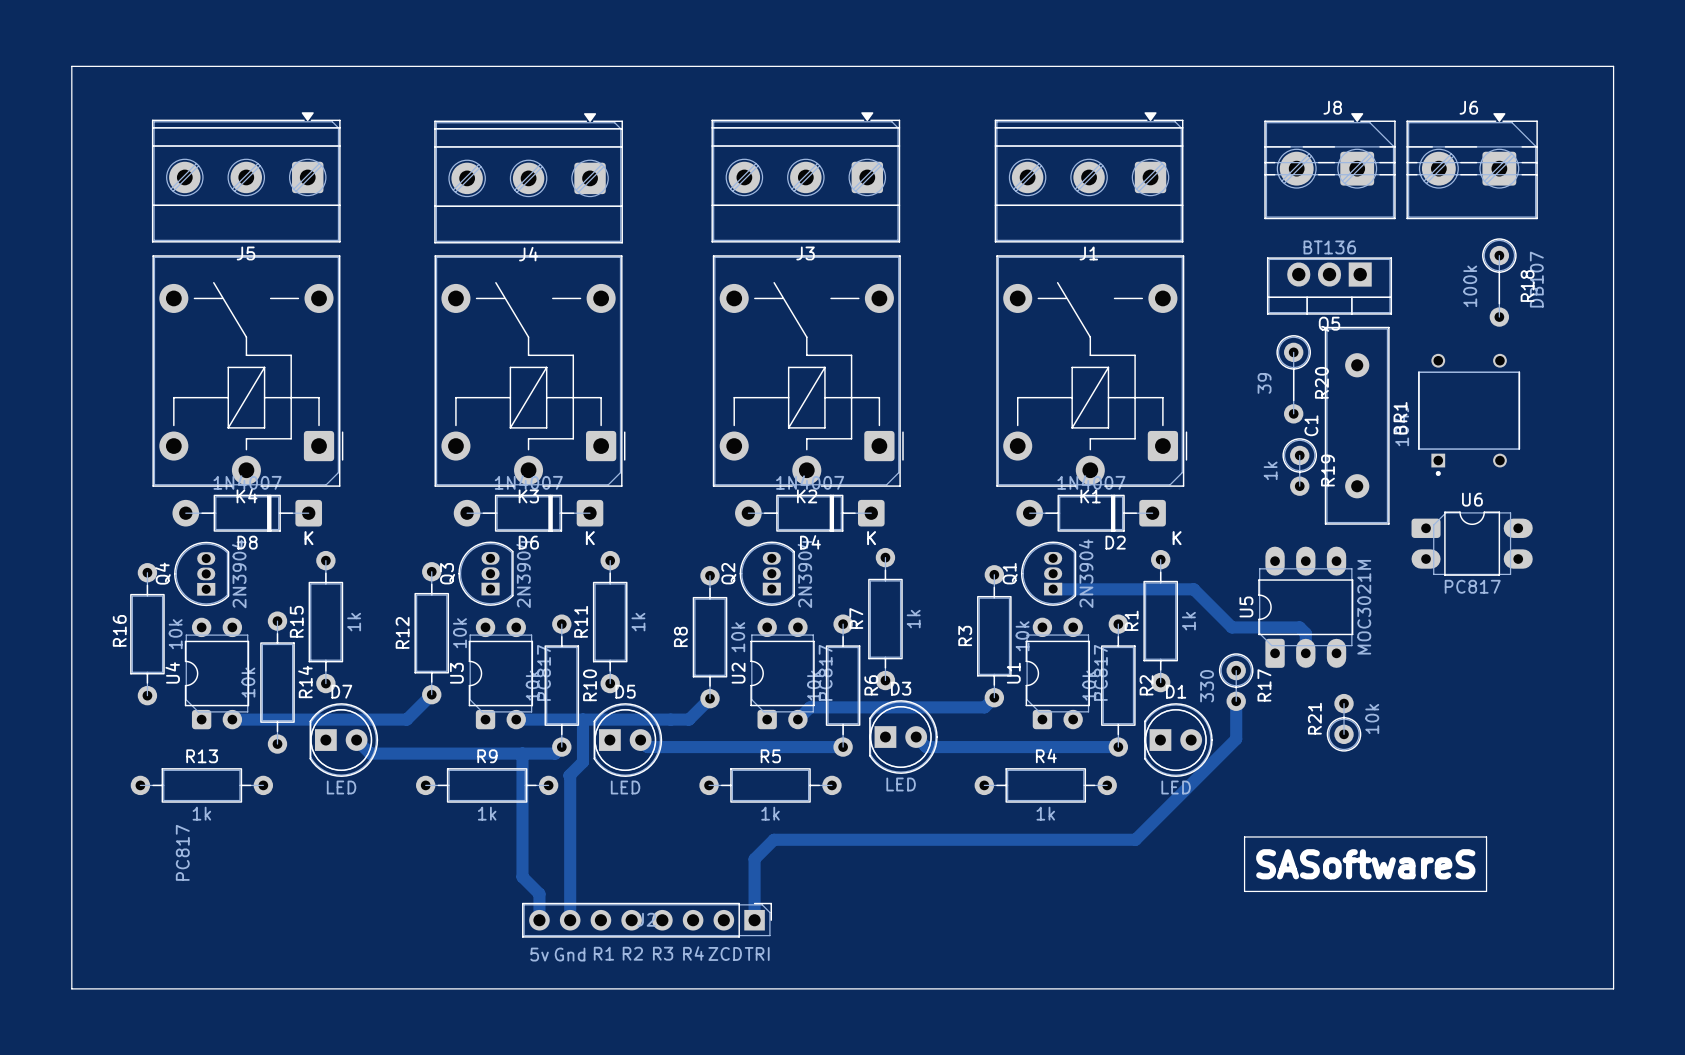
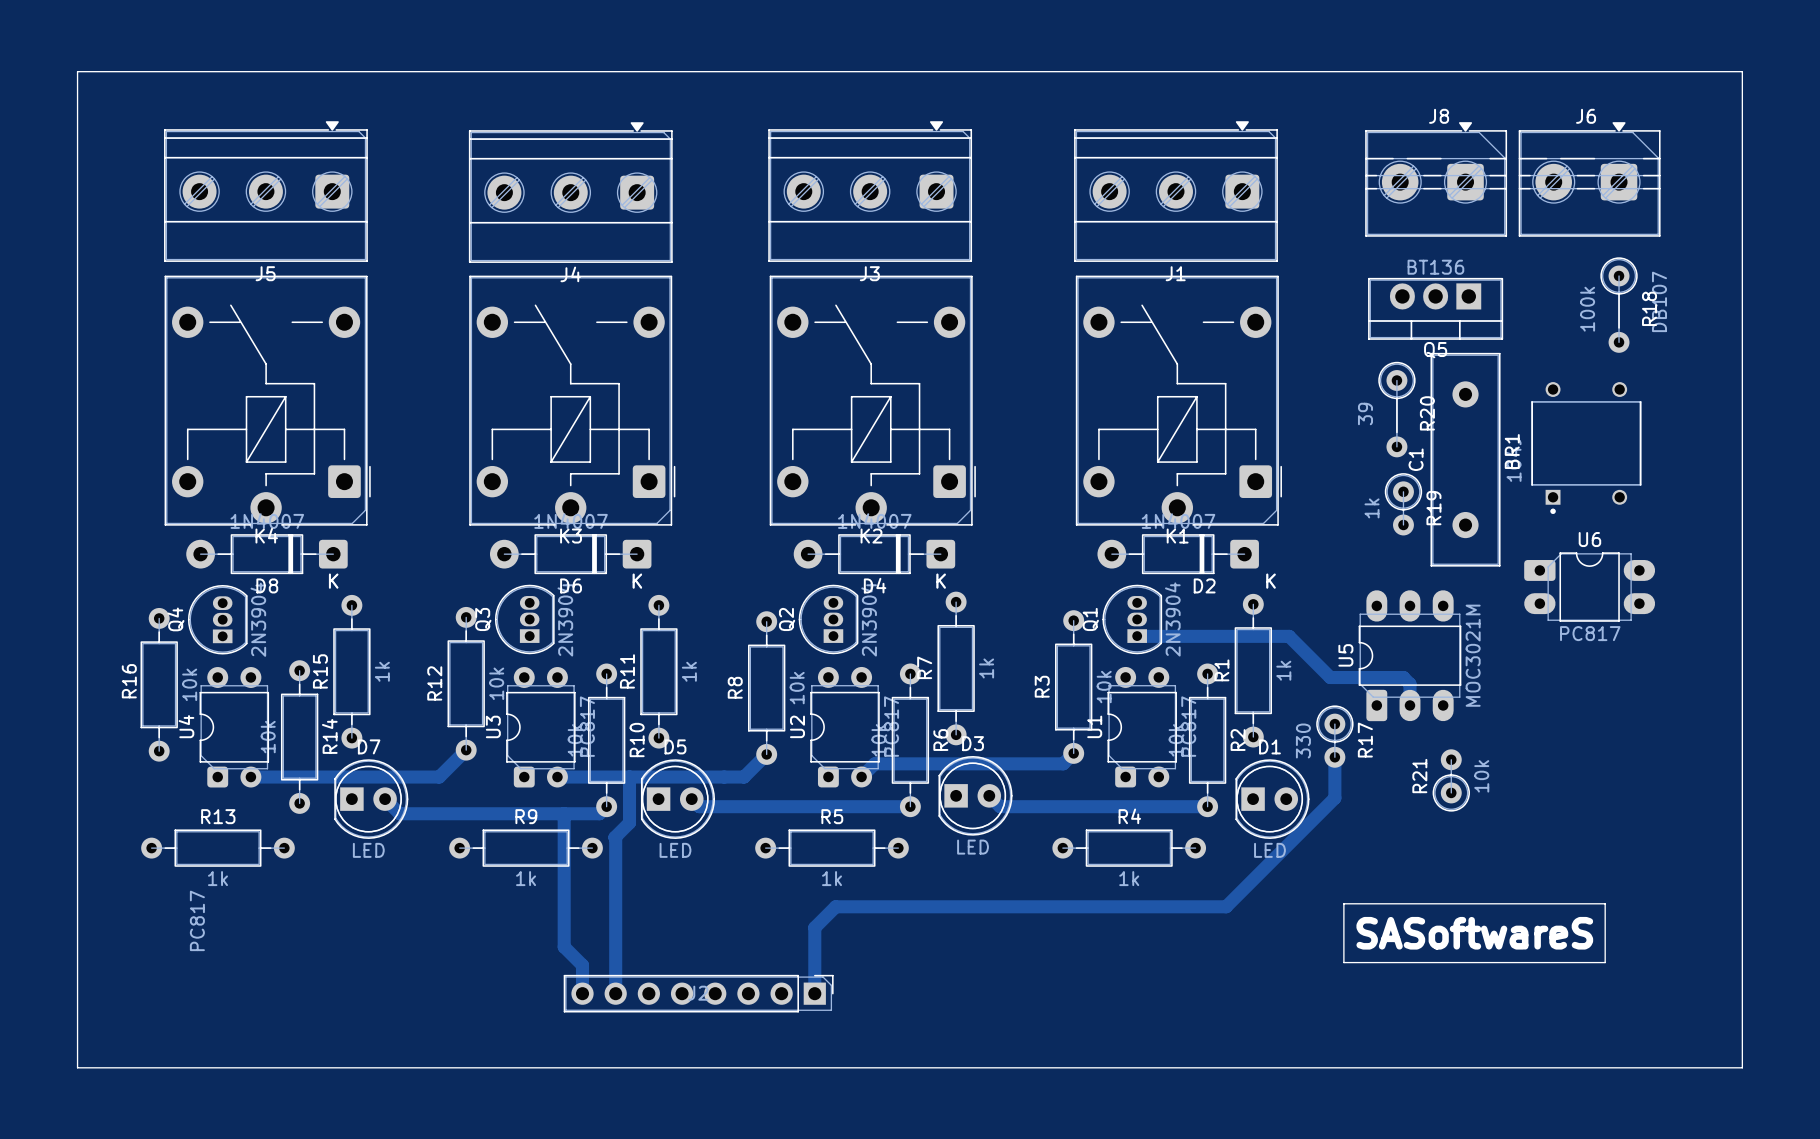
text: R1 (603, 953) -> none
text: R2 (632, 953) -> none
text: R3 (663, 953) -> none
text: R4 (693, 953) -> none
text: ZCD (725, 953) -> none
text: TRI (757, 953) -> none
text: 5v (539, 954) -> none
text: Gnd (570, 954) -> none

